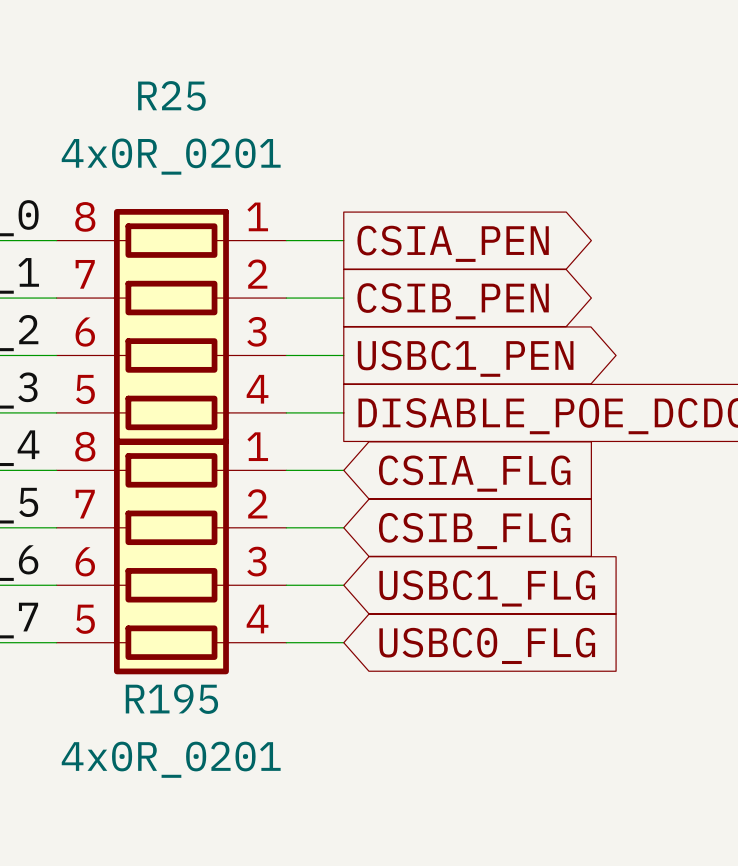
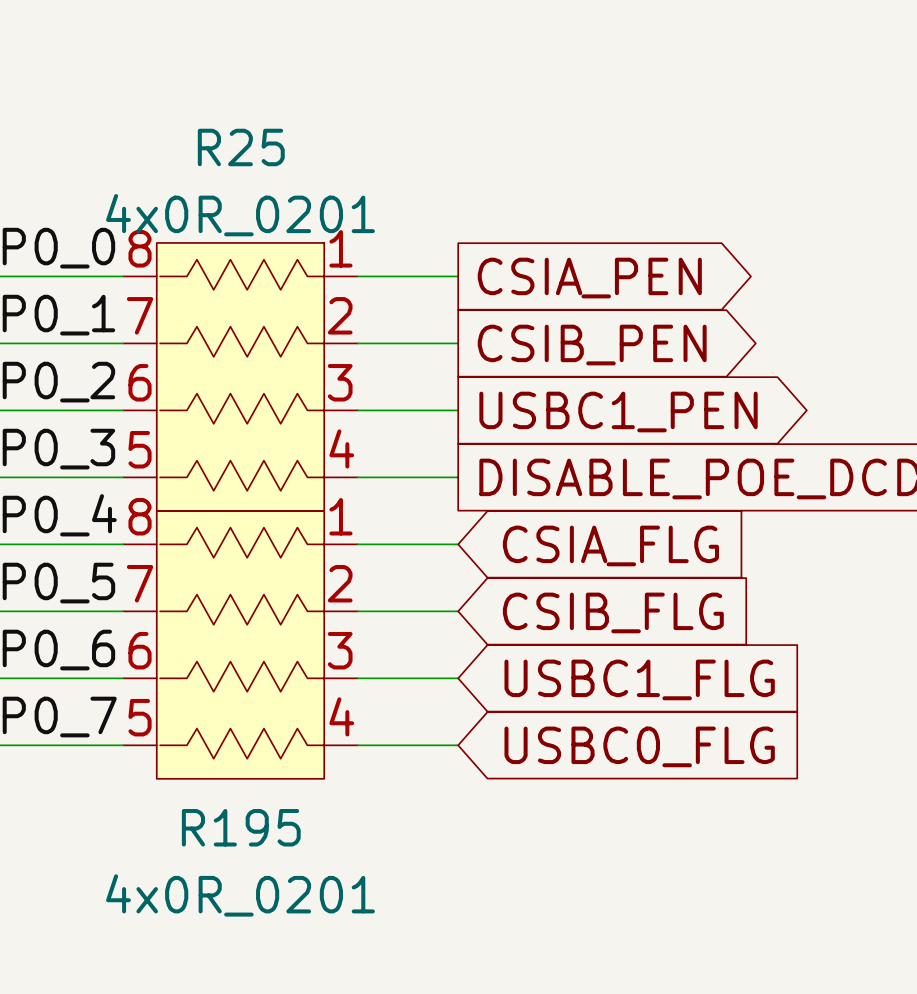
R25 symbol: [56, 209, 287, 445] -> [123, 242, 358, 511]
R195 symbol: [56, 438, 287, 675] -> [123, 510, 358, 779]

